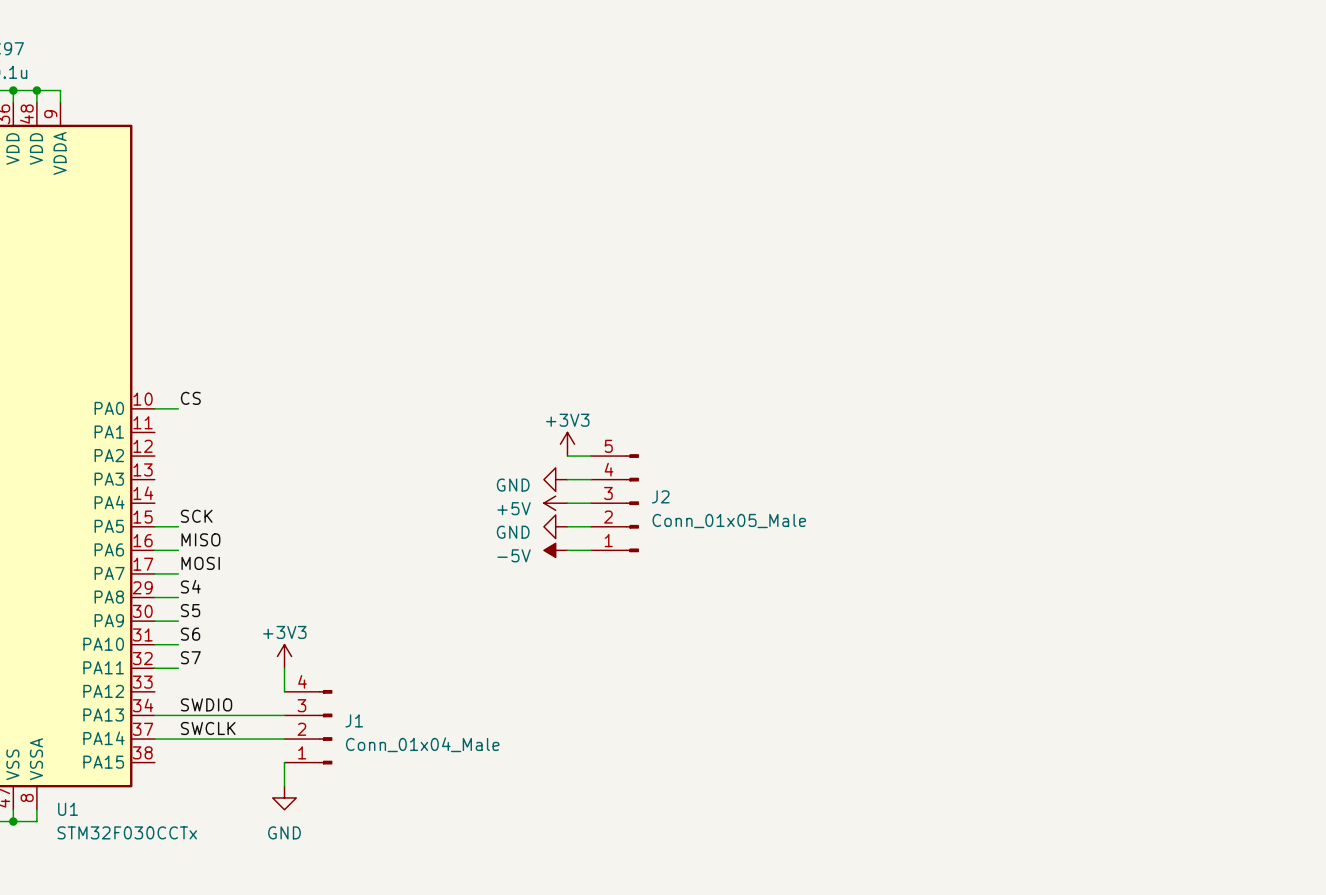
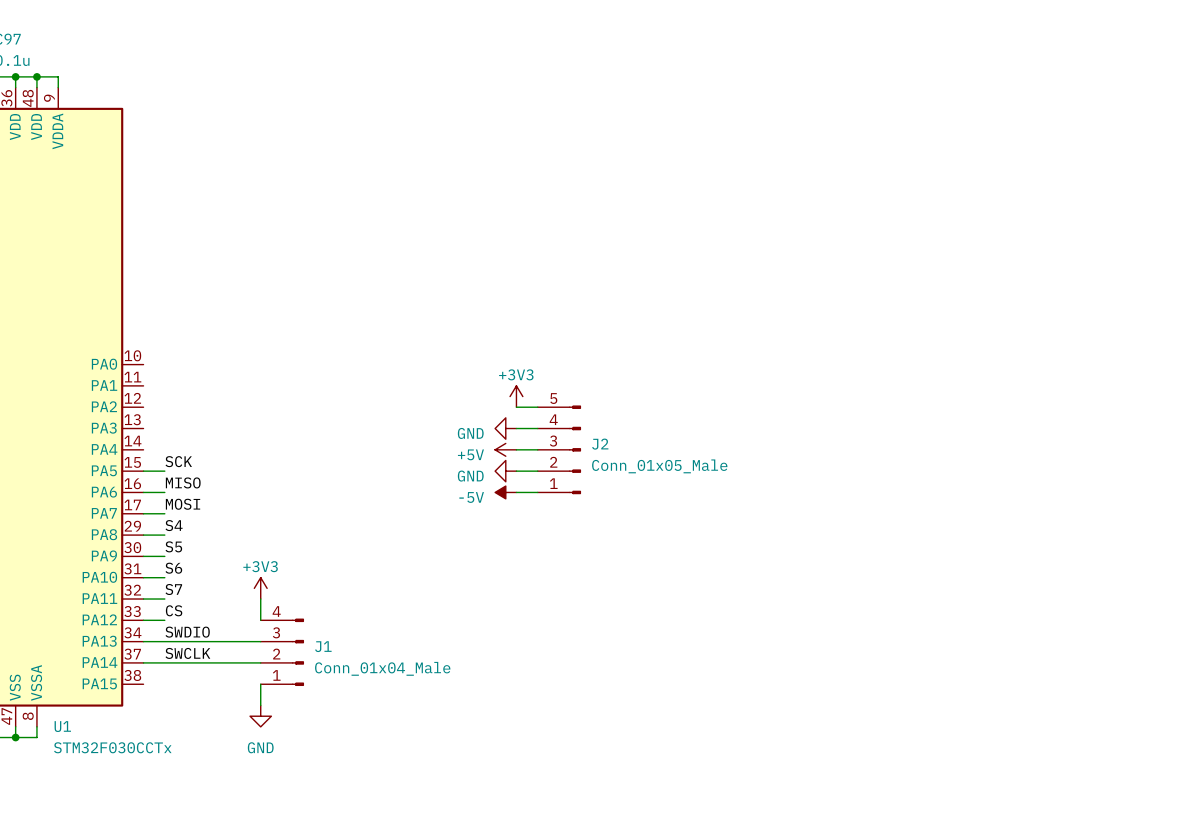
label: CS (190, 398) -> none
wire: (154, 408) (178, 408) -> none
label: none -> CS (174, 610)
wire: none -> (143, 620) (164, 620)

